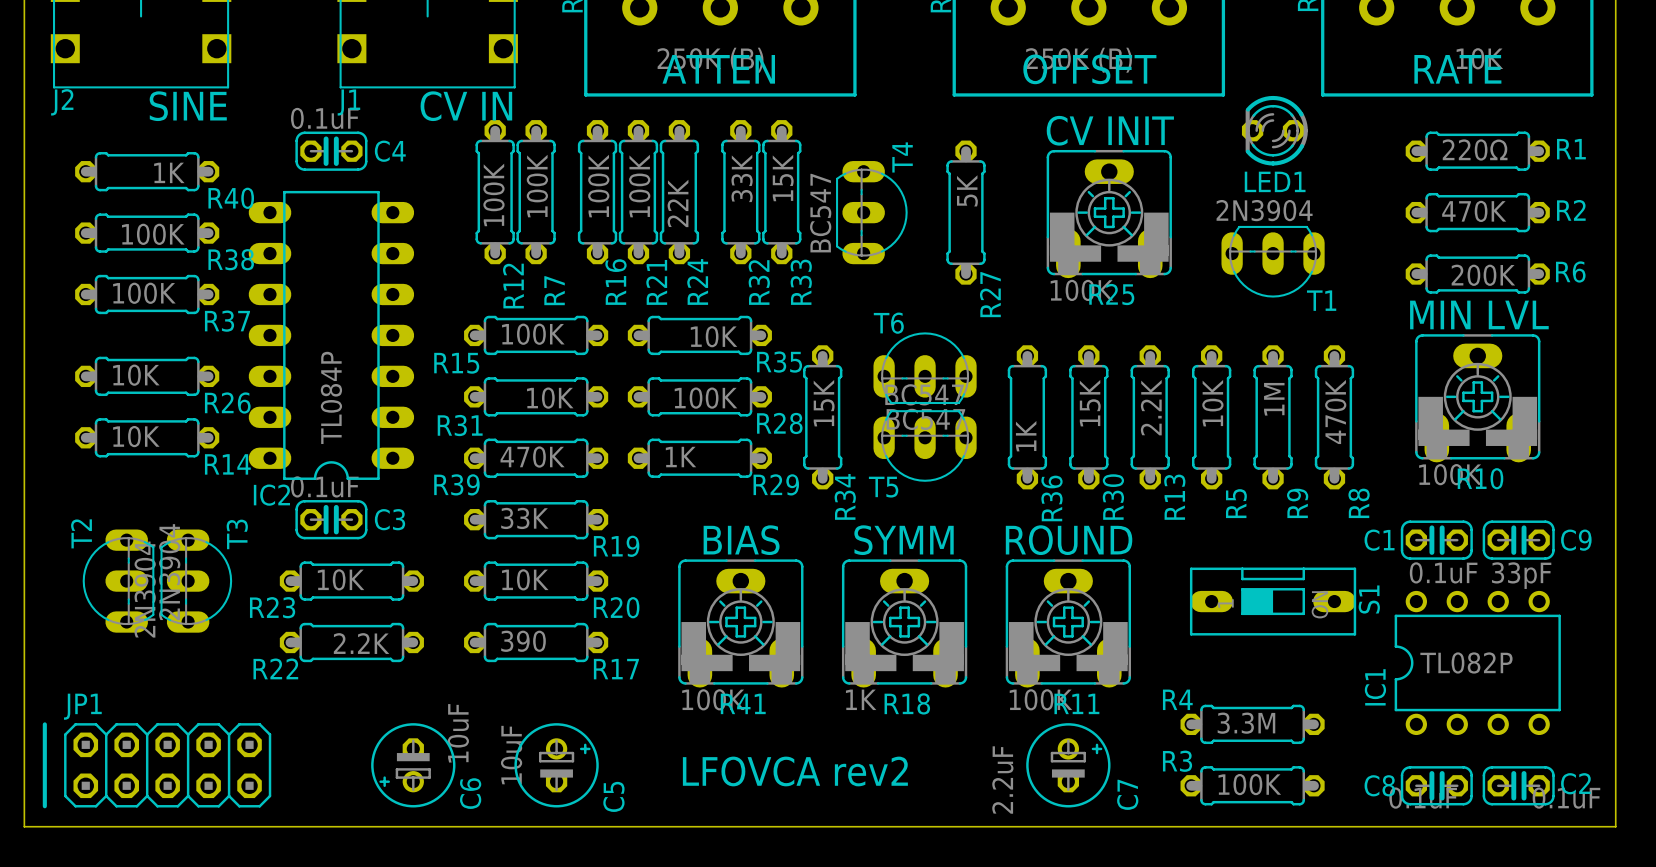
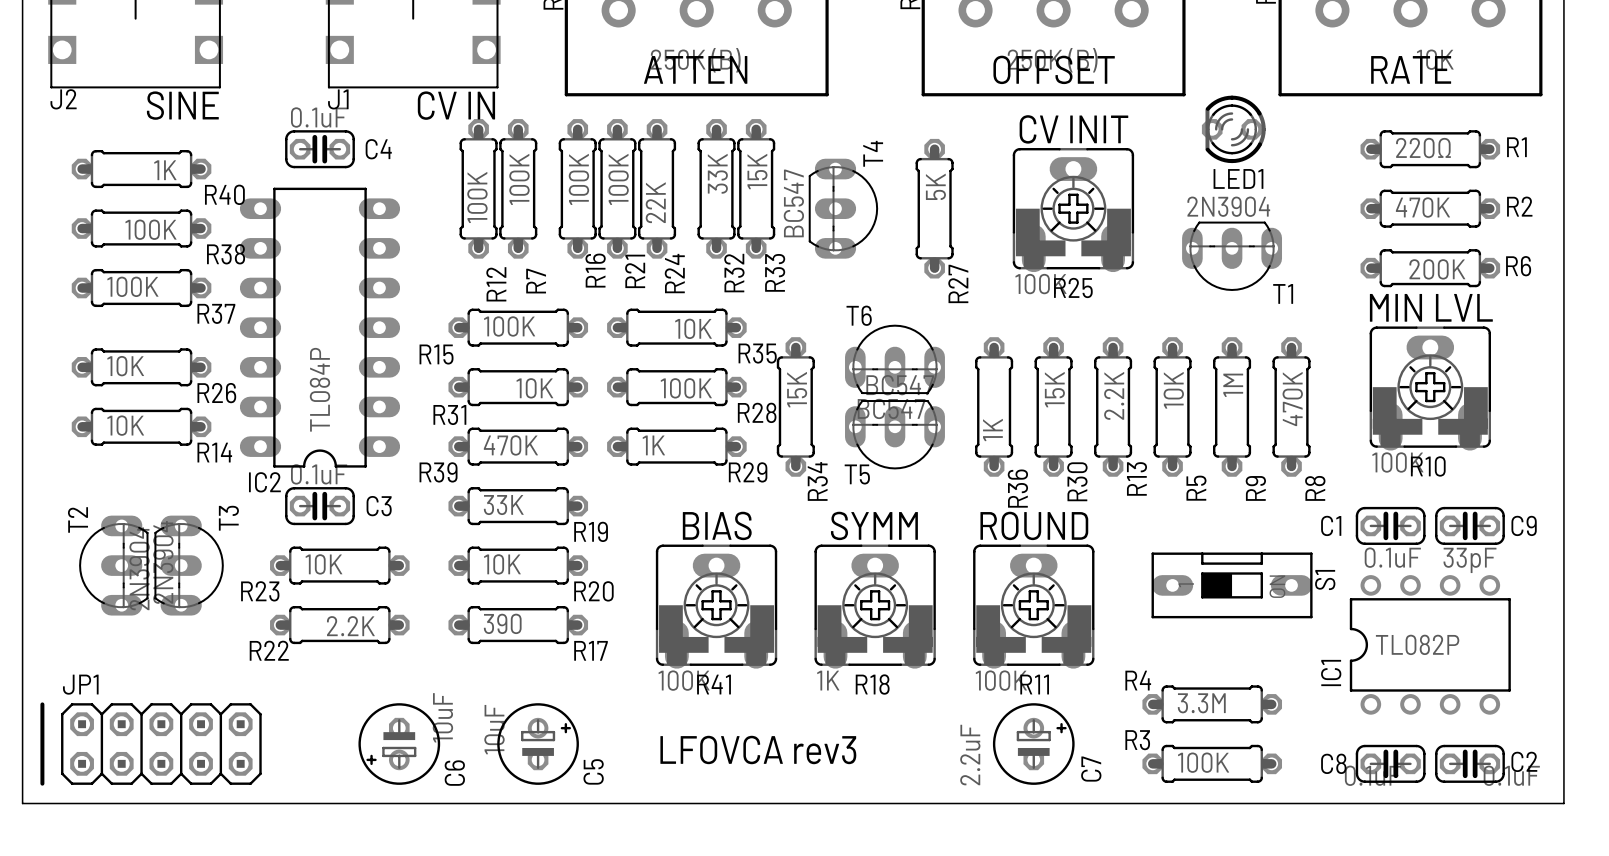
text: LFOVCA rev2 (795, 771) -> LFOVCA rev3 (758, 750)

